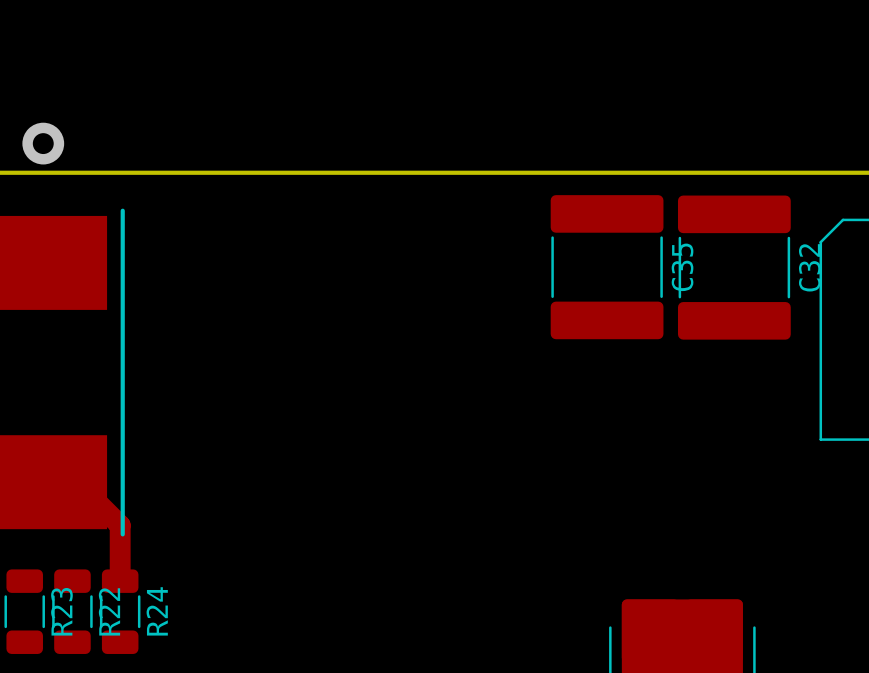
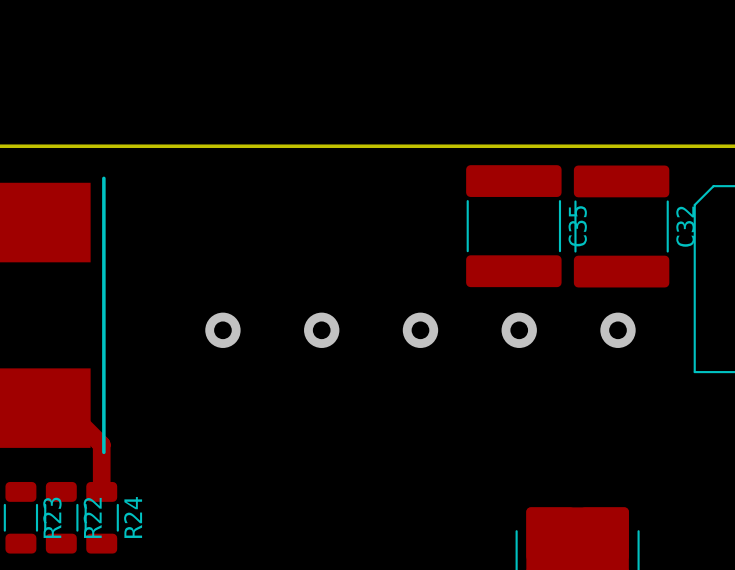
via: (43, 143) -> none
via: none -> (222, 330)
via: none -> (321, 330)
via: none -> (420, 330)
via: none -> (519, 330)
via: none -> (618, 330)

